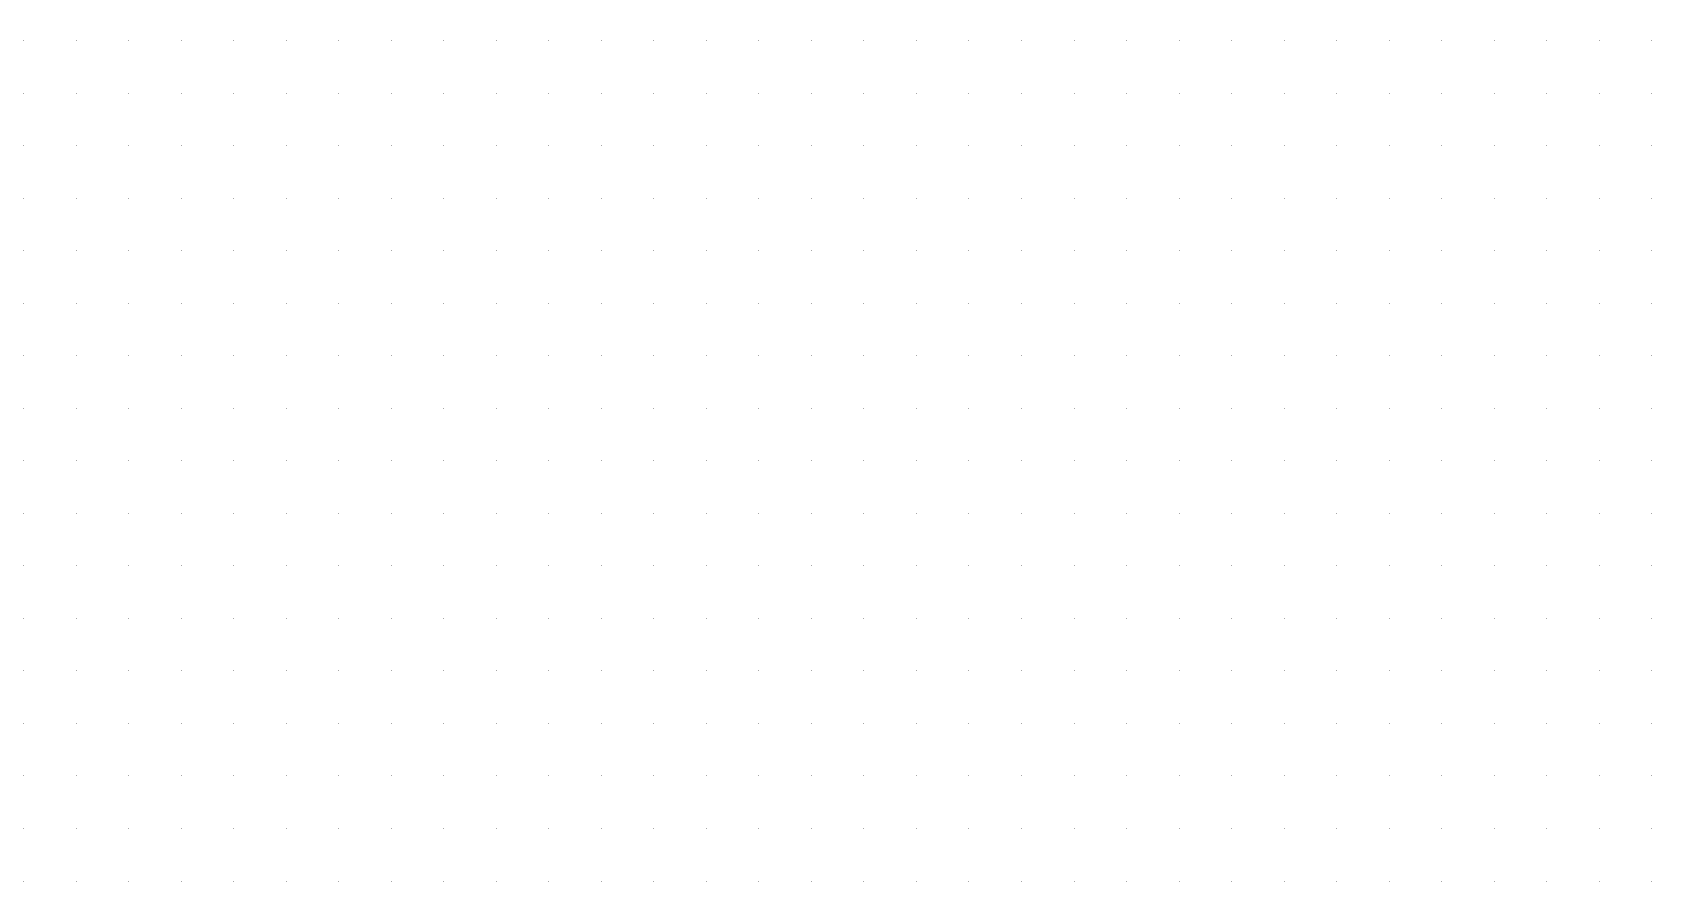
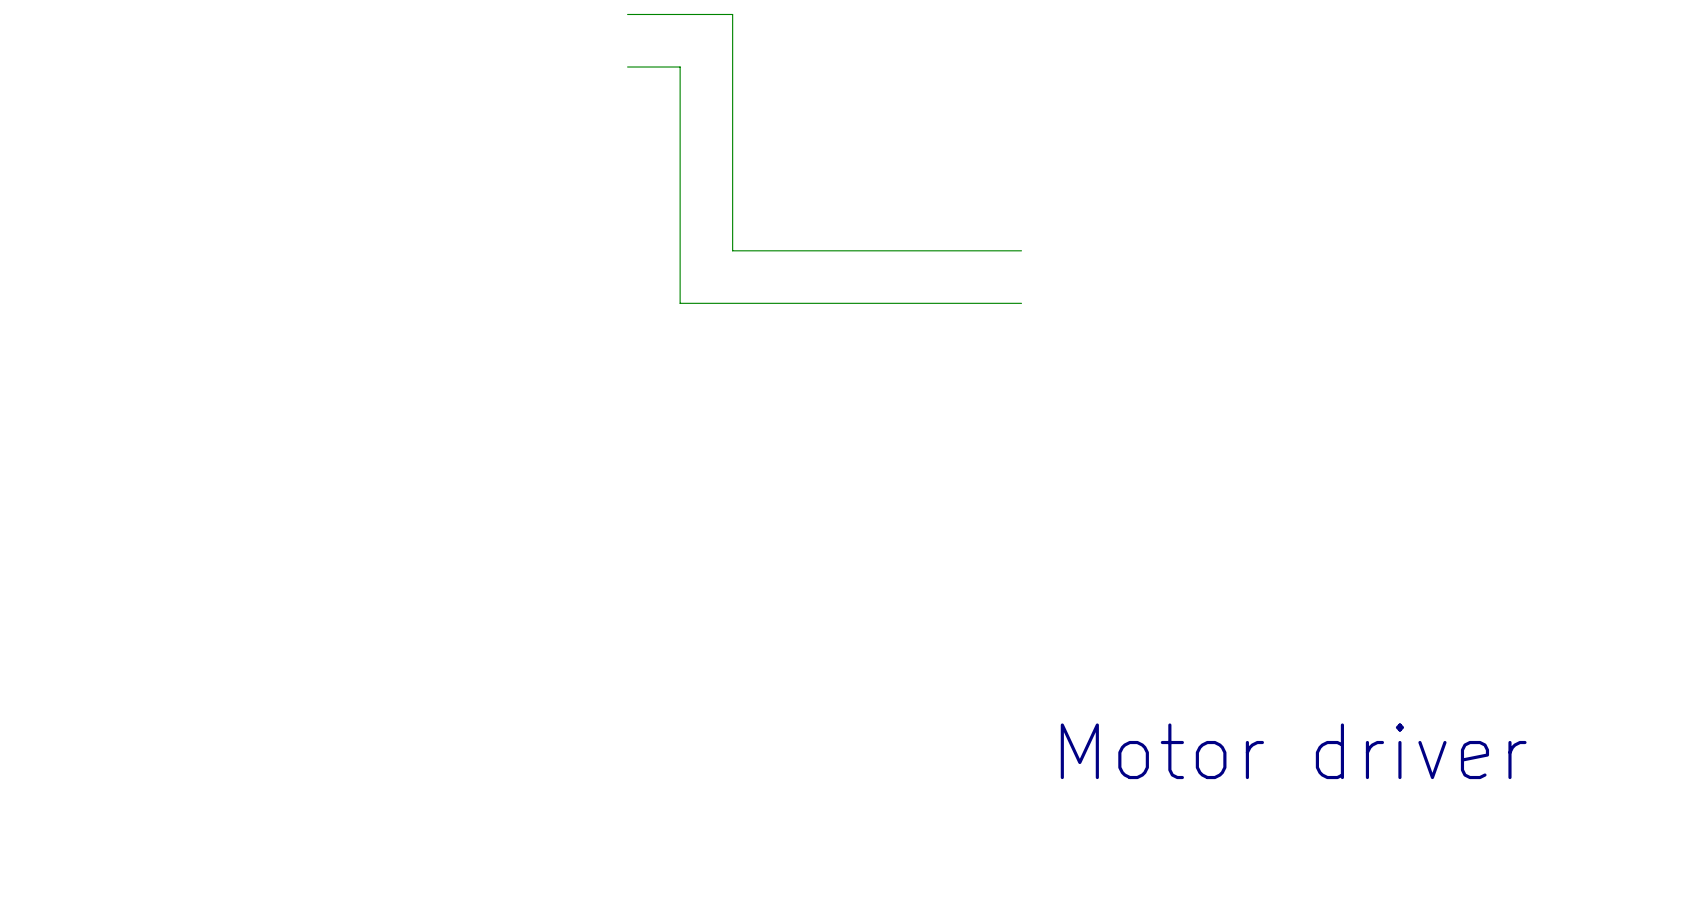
wire: none -> (627, 14) (732, 14) (732, 250) (1021, 250)
wire: none -> (627, 67) (680, 67) (680, 303) (1021, 303)
text: none -> Motor driver (1293, 751)

